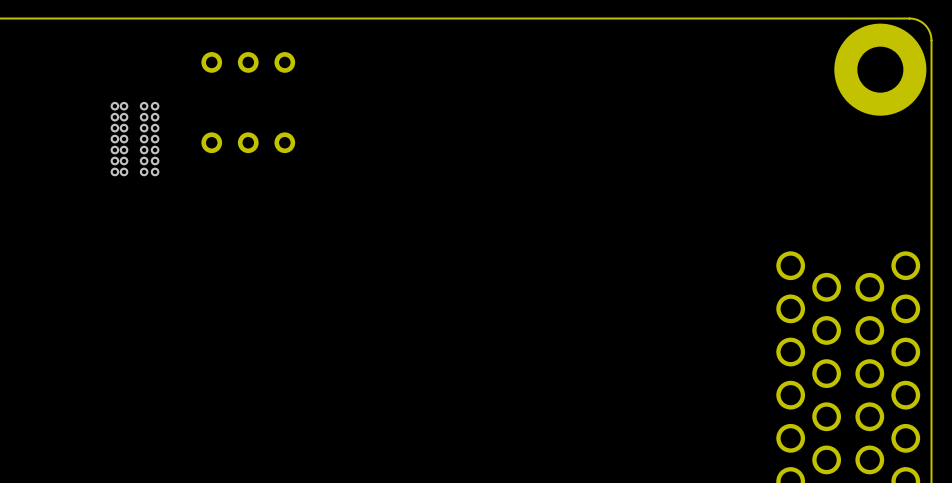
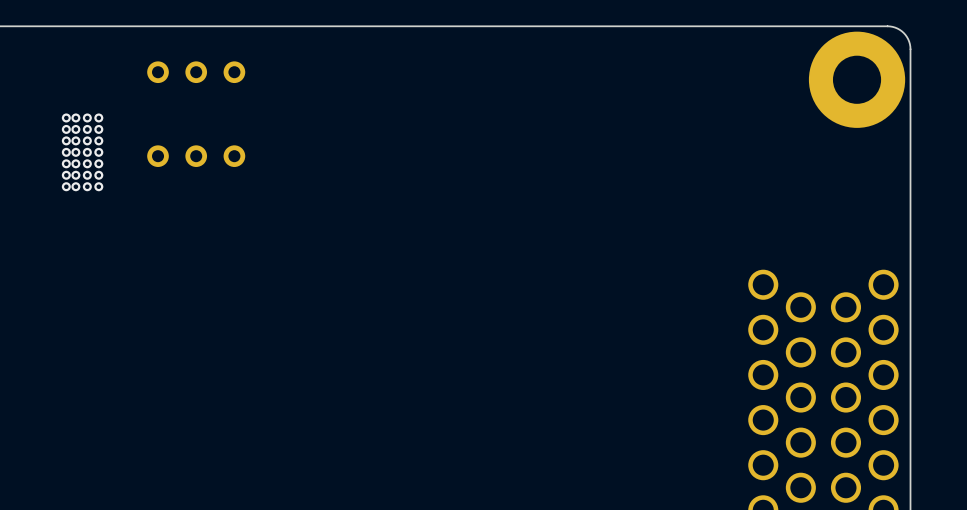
via: (114, 106) -> none
via: none -> (75, 117)
via: (114, 117) -> none
via: none -> (75, 129)
via: (114, 128) -> none
via: none -> (75, 140)
via: (114, 139) -> none
via: none -> (75, 152)
via: (114, 150) -> none
via: none -> (75, 163)
via: (114, 161) -> none
via: none -> (75, 175)
via: (114, 171) -> none
via: none -> (75, 186)

